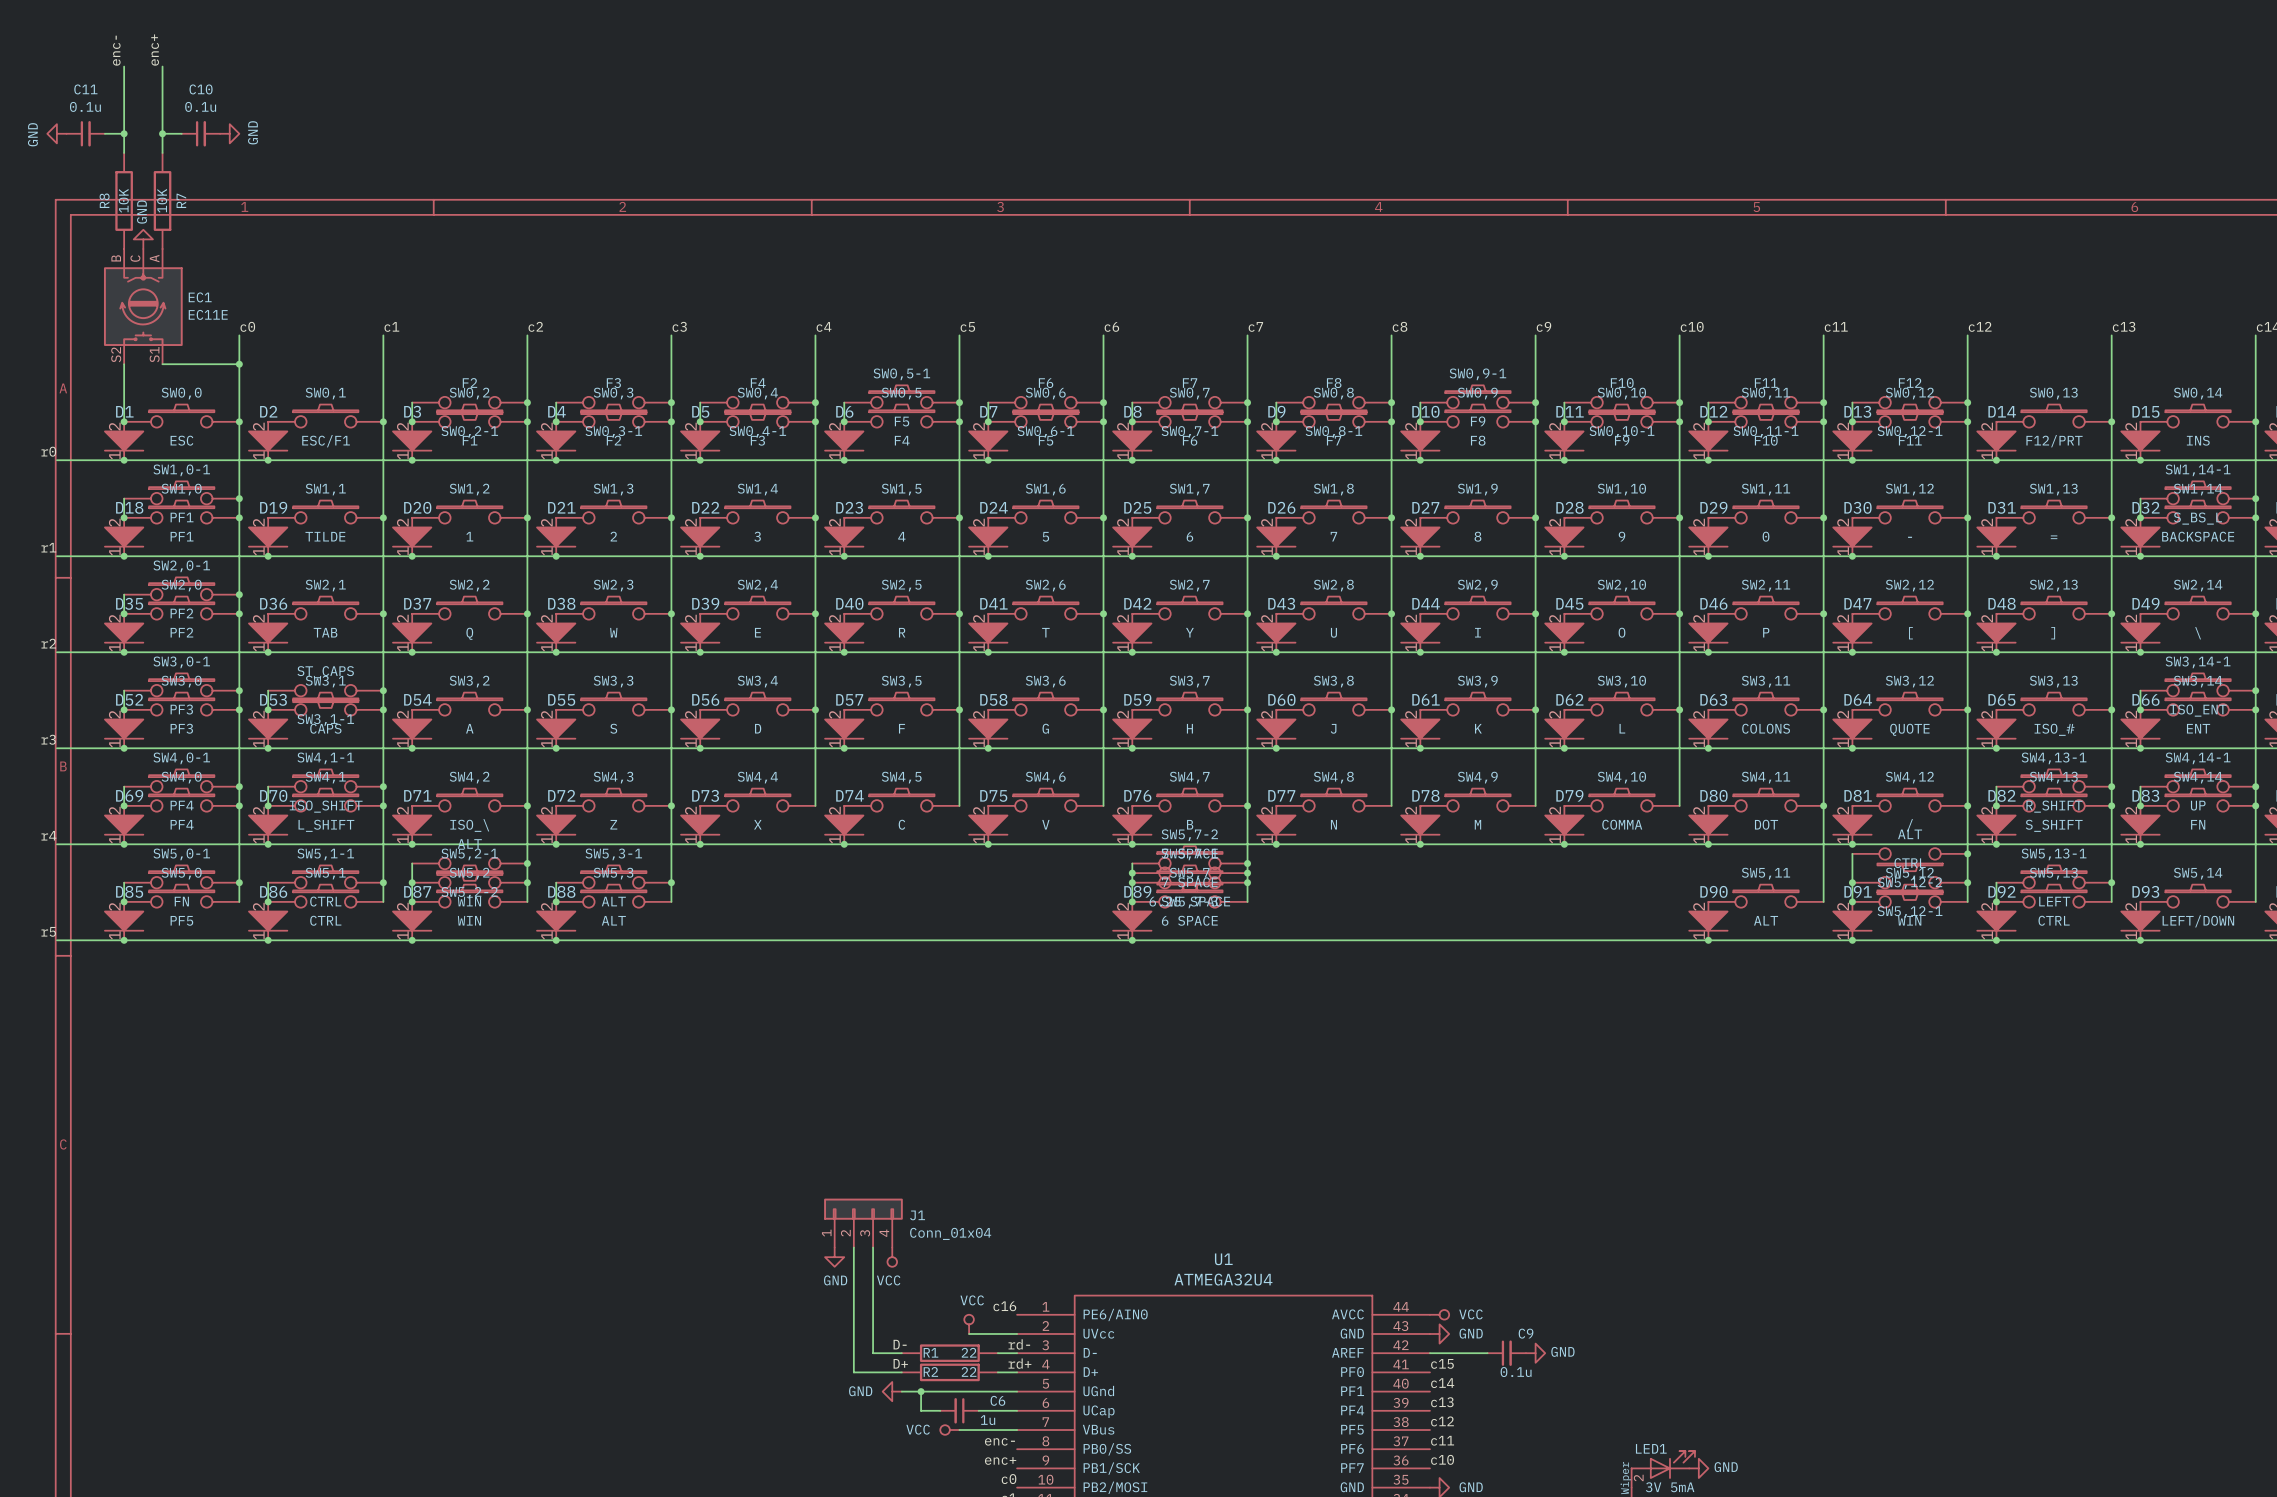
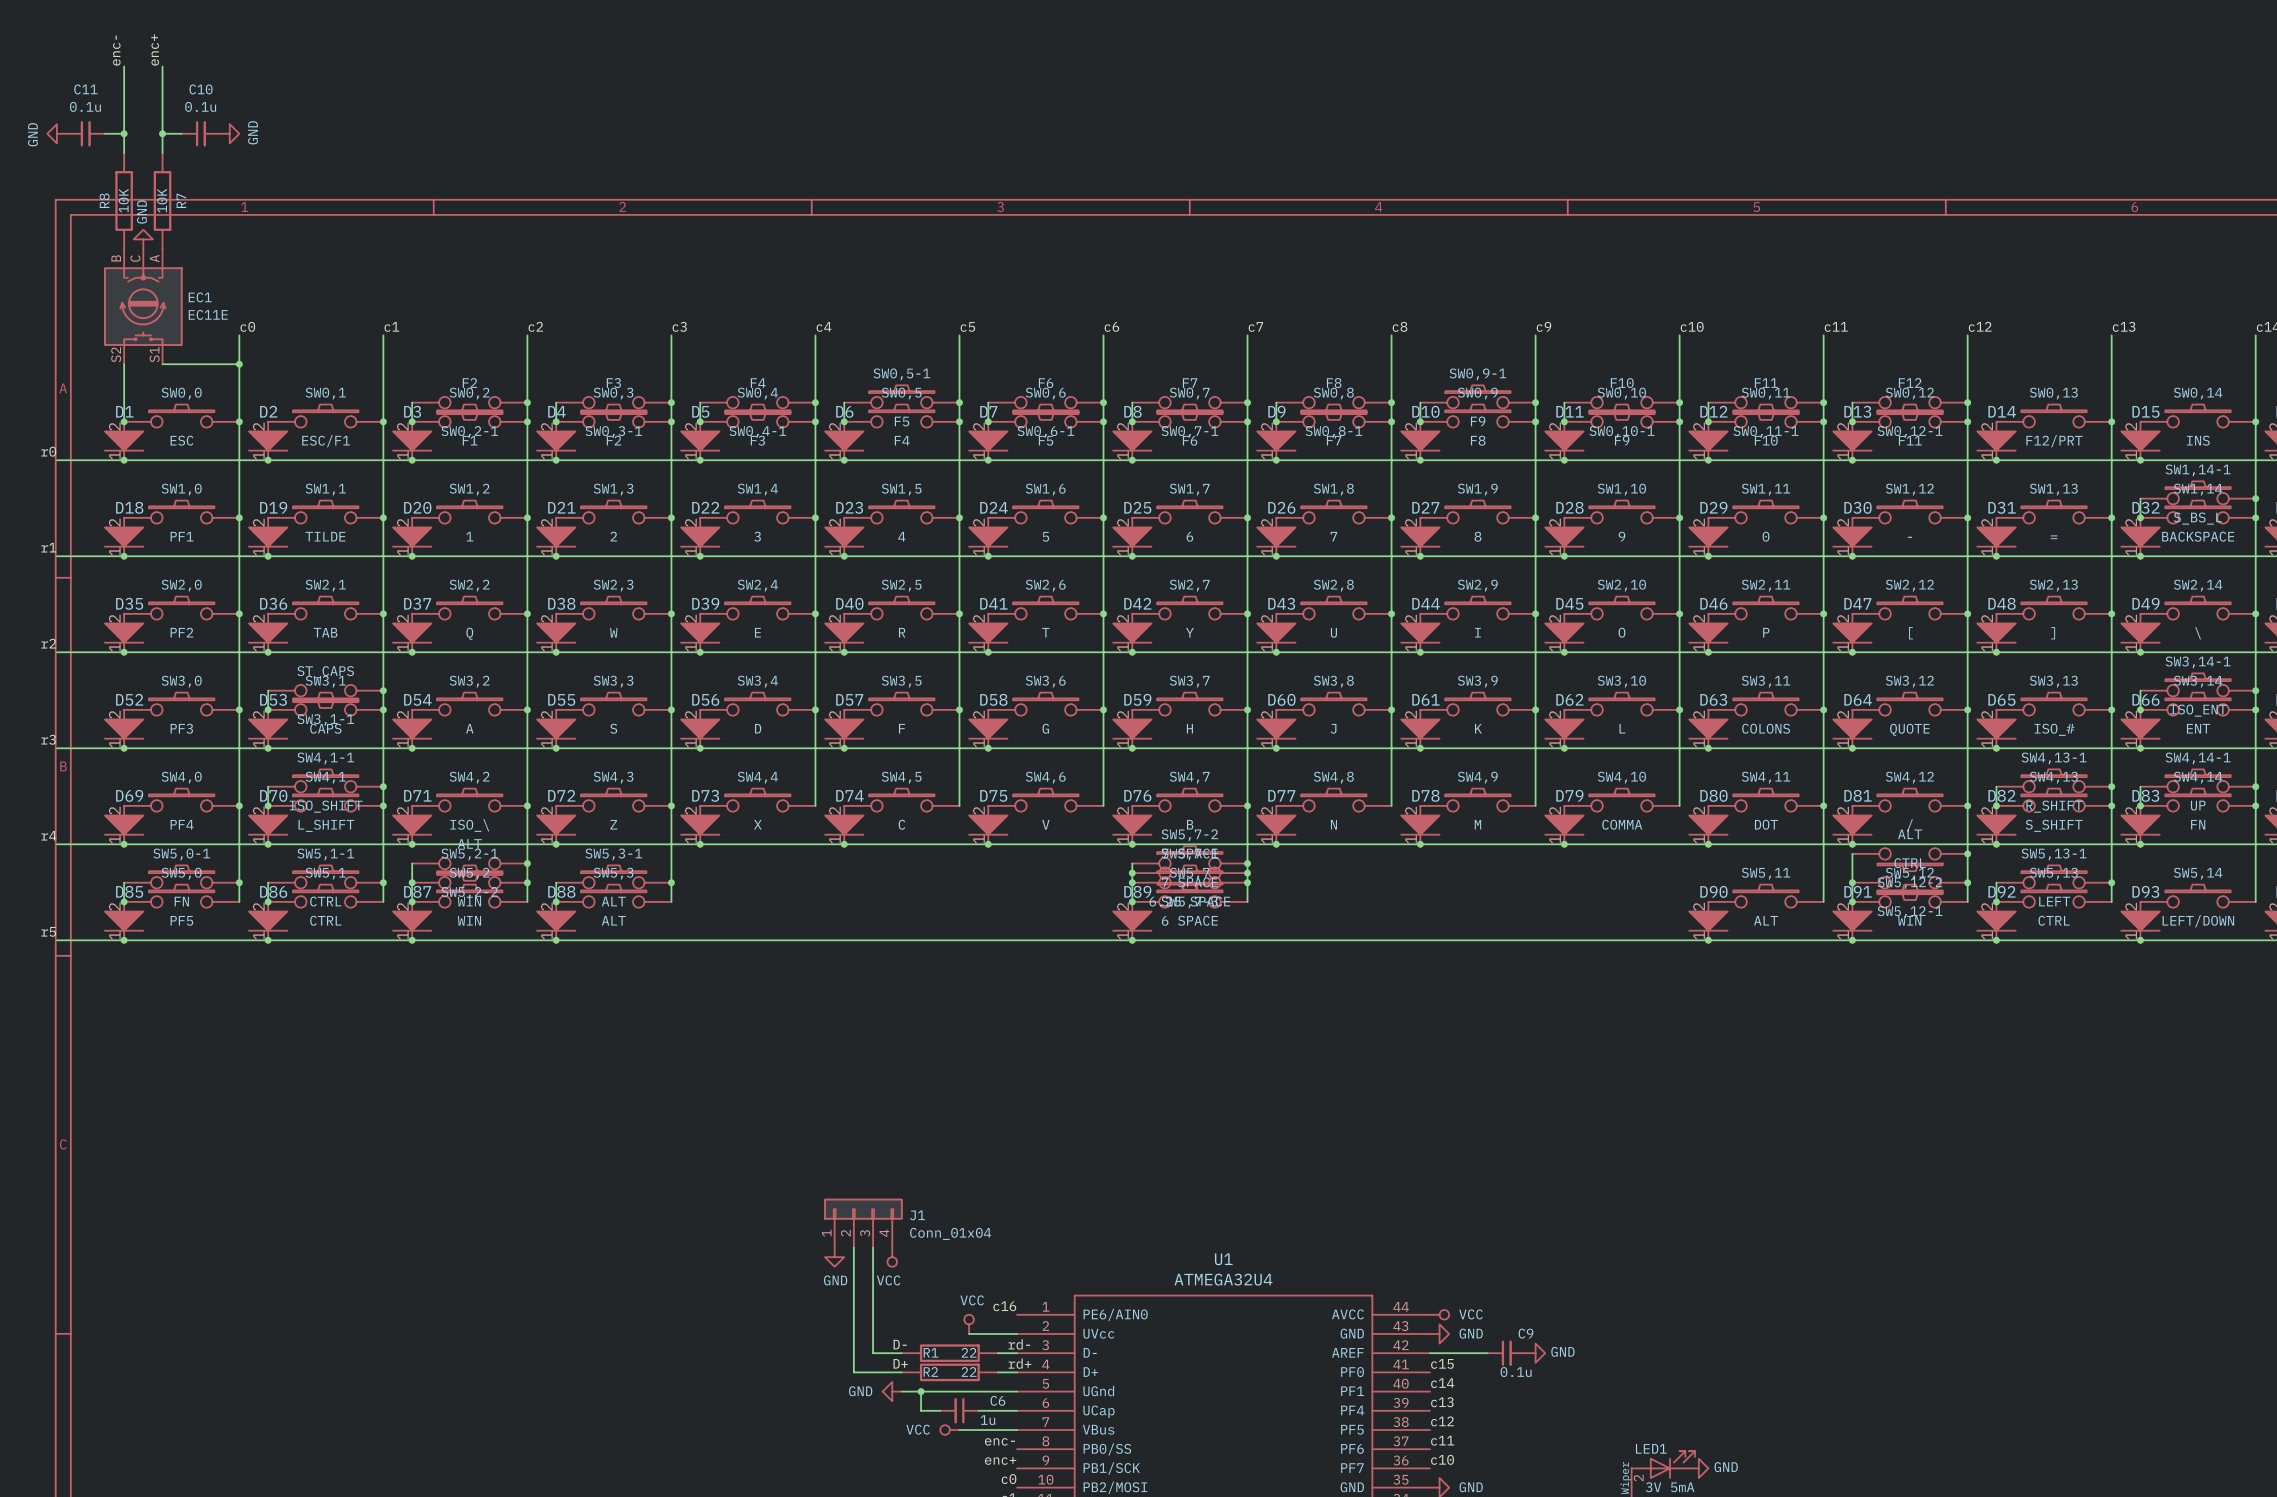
SW1,0-1: PF1 (181, 492) -> none
wire: (124, 498) (124, 517) -> none
junction: (239, 498) -> none
junction: (124, 517) -> none
SW2,0-1: PF2 (181, 588) -> none
wire: (124, 594) (124, 613) -> none
junction: (239, 594) -> none
junction: (124, 613) -> none
SW3,0-1: PF3 (181, 684) -> none
wire: (124, 690) (124, 709) -> none
junction: (239, 690) -> none
junction: (124, 709) -> none
SW4,0-1: PF4 (181, 780) -> none
wire: (124, 786) (124, 805) -> none
junction: (239, 786) -> none
junction: (124, 805) -> none

